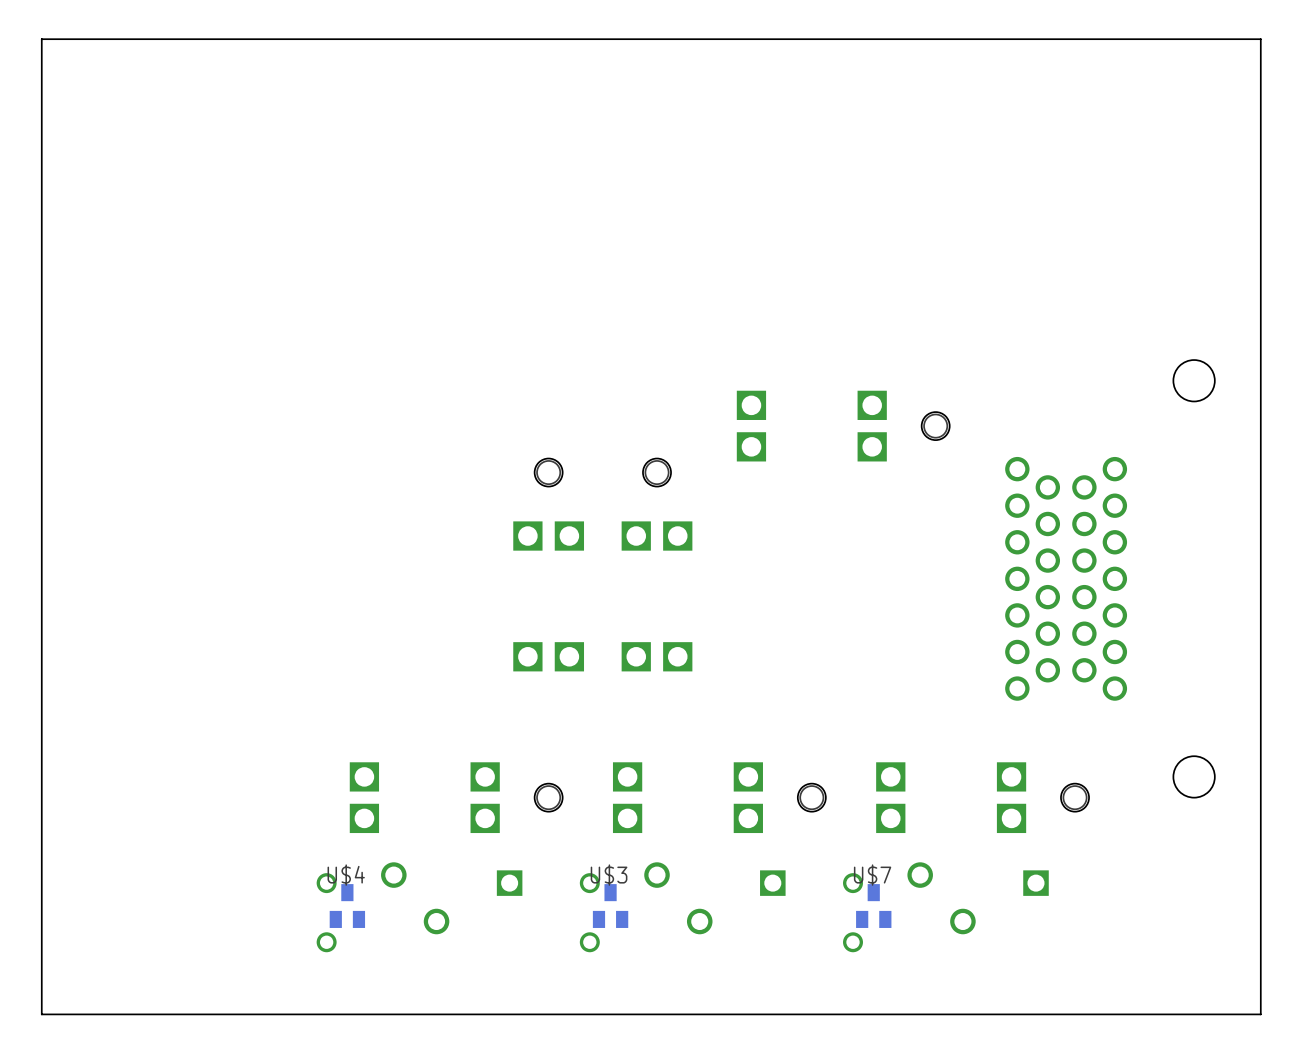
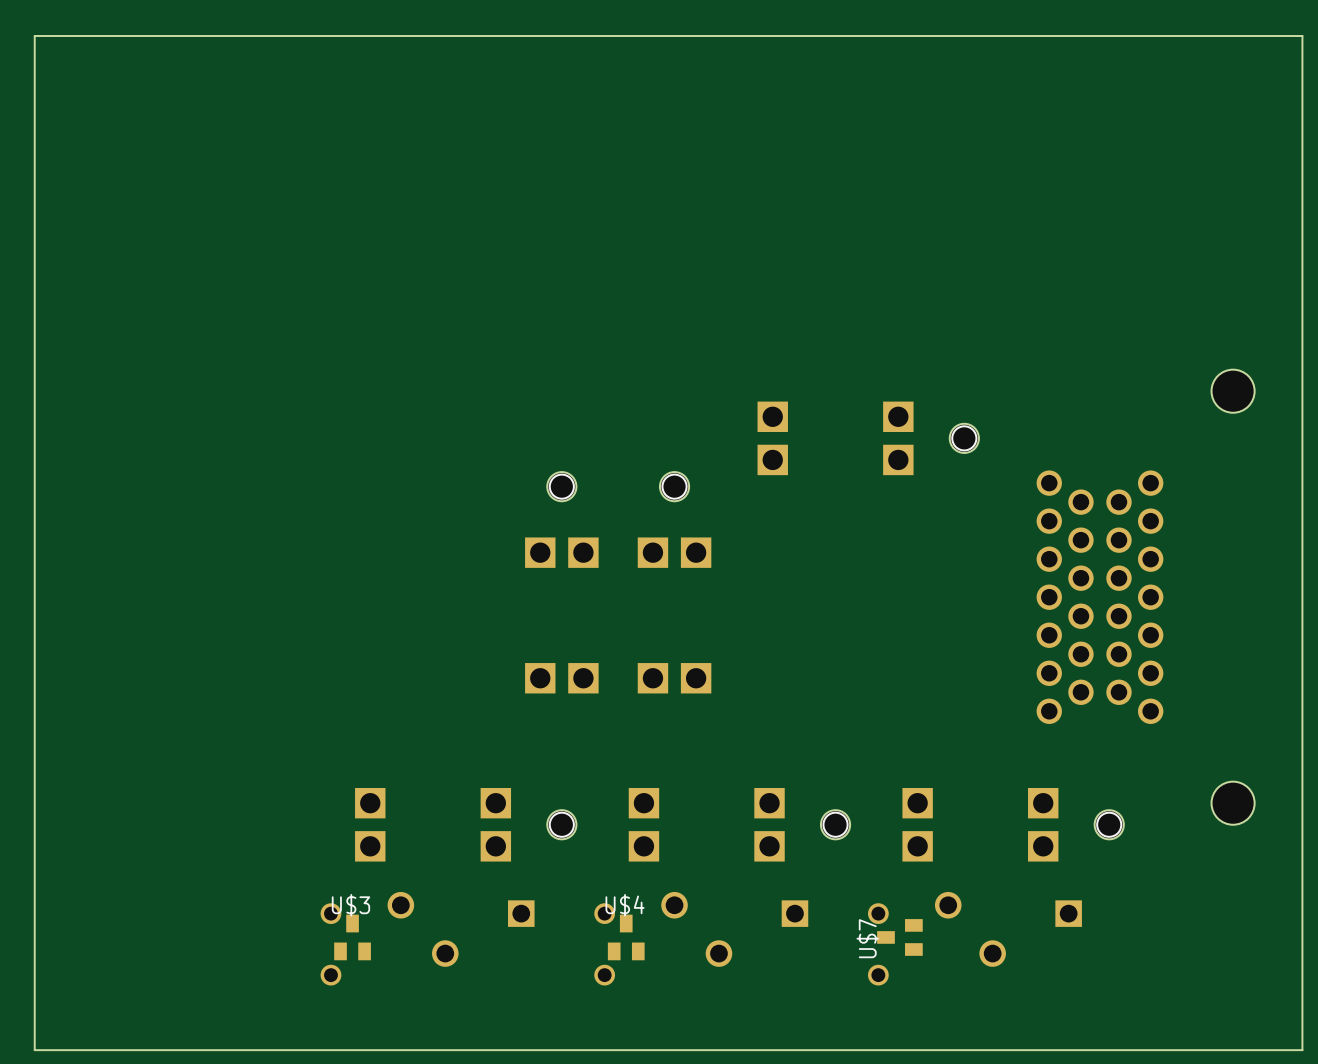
U$4 name: U$4 (346, 875) -> U$3 (350, 905)
U$3 name: U$3 (609, 875) -> U$4 (625, 905)
U$7 rotation: 0° (873, 906) -> 90° counterclockwise (899, 937)

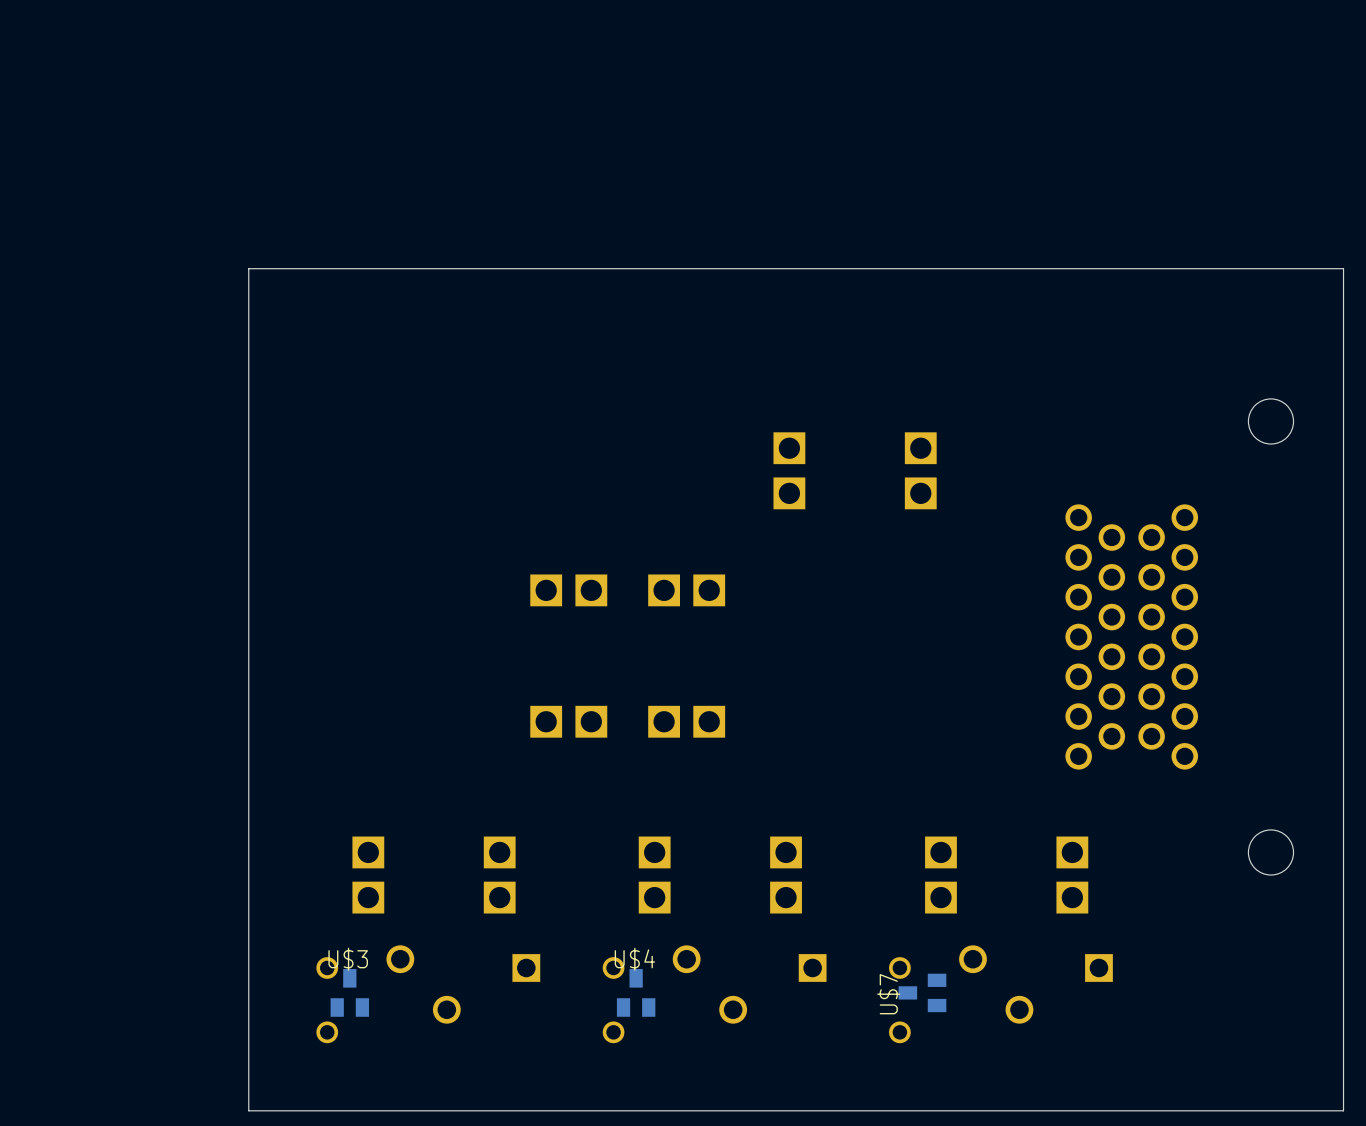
board edge: (1302, 245) (1302, 36) (34, 36) (34, 1050) (255, 1050) -> (1343, 268) (248, 268) (248, 1110)
part: (964, 438) -> none
part: (561, 486) -> none
part: (674, 486) -> none
part: (561, 824) -> none
part: (835, 824) -> none
part: (1109, 824) -> none

